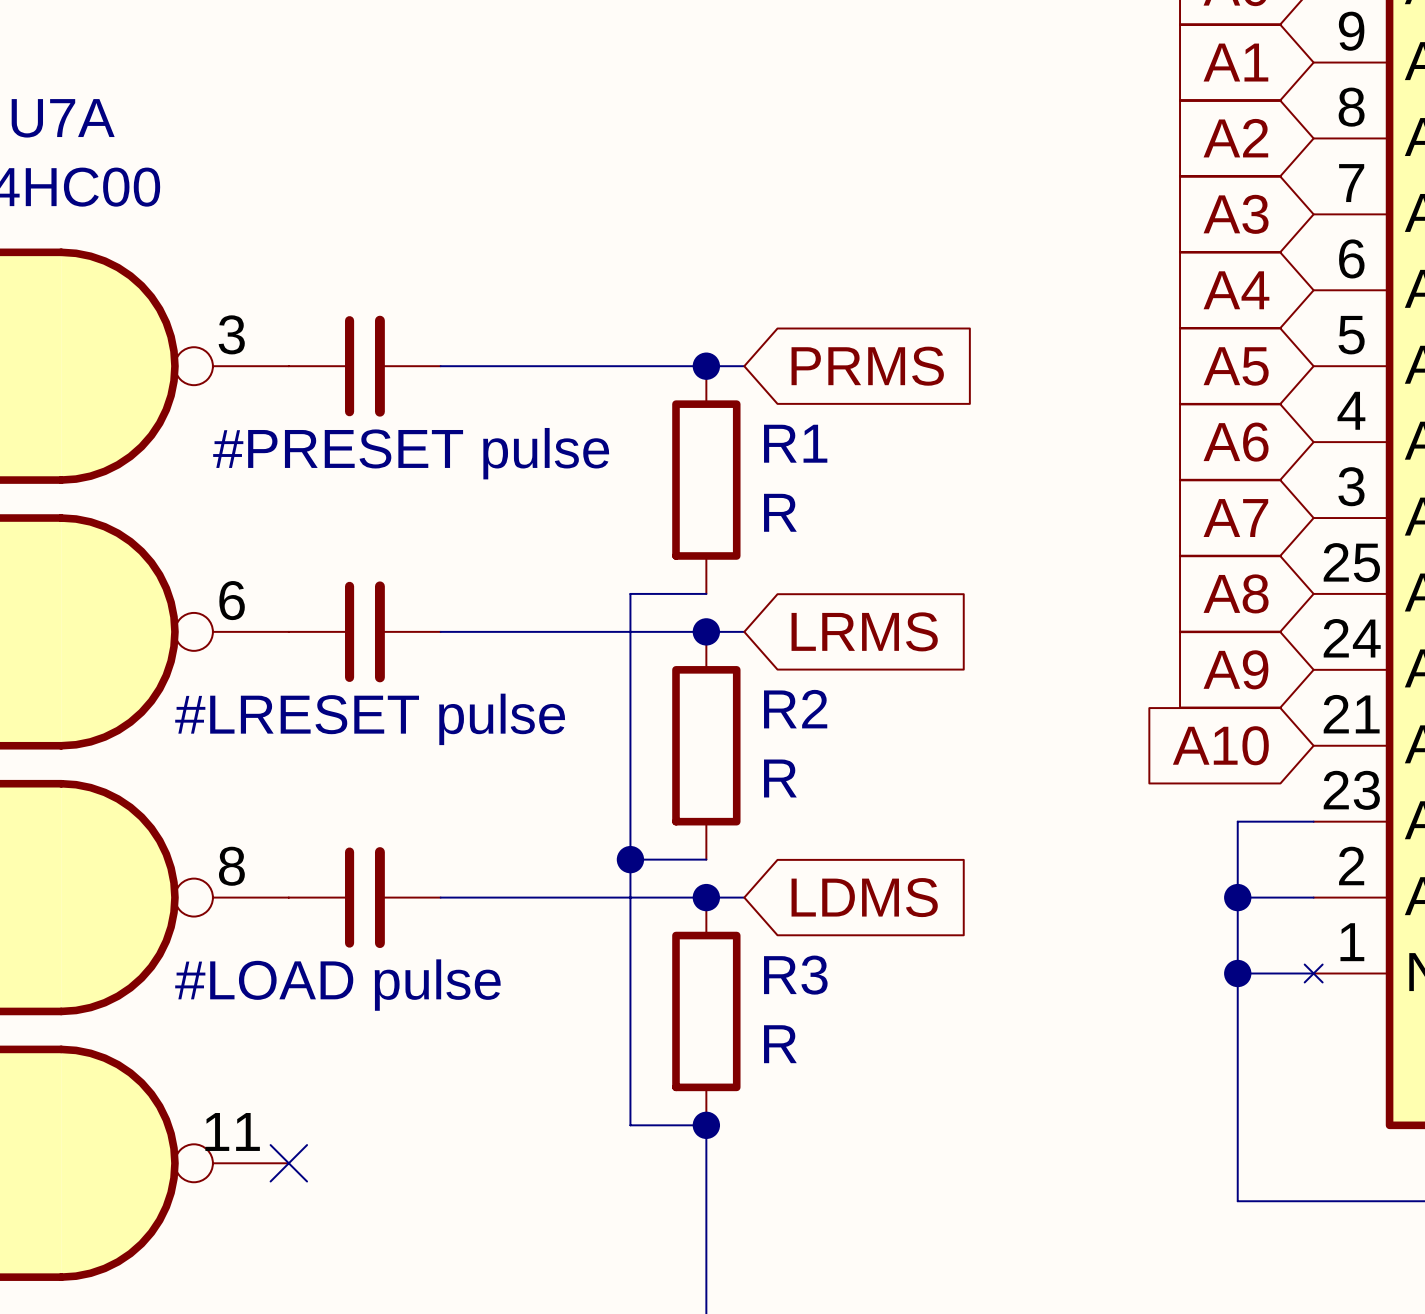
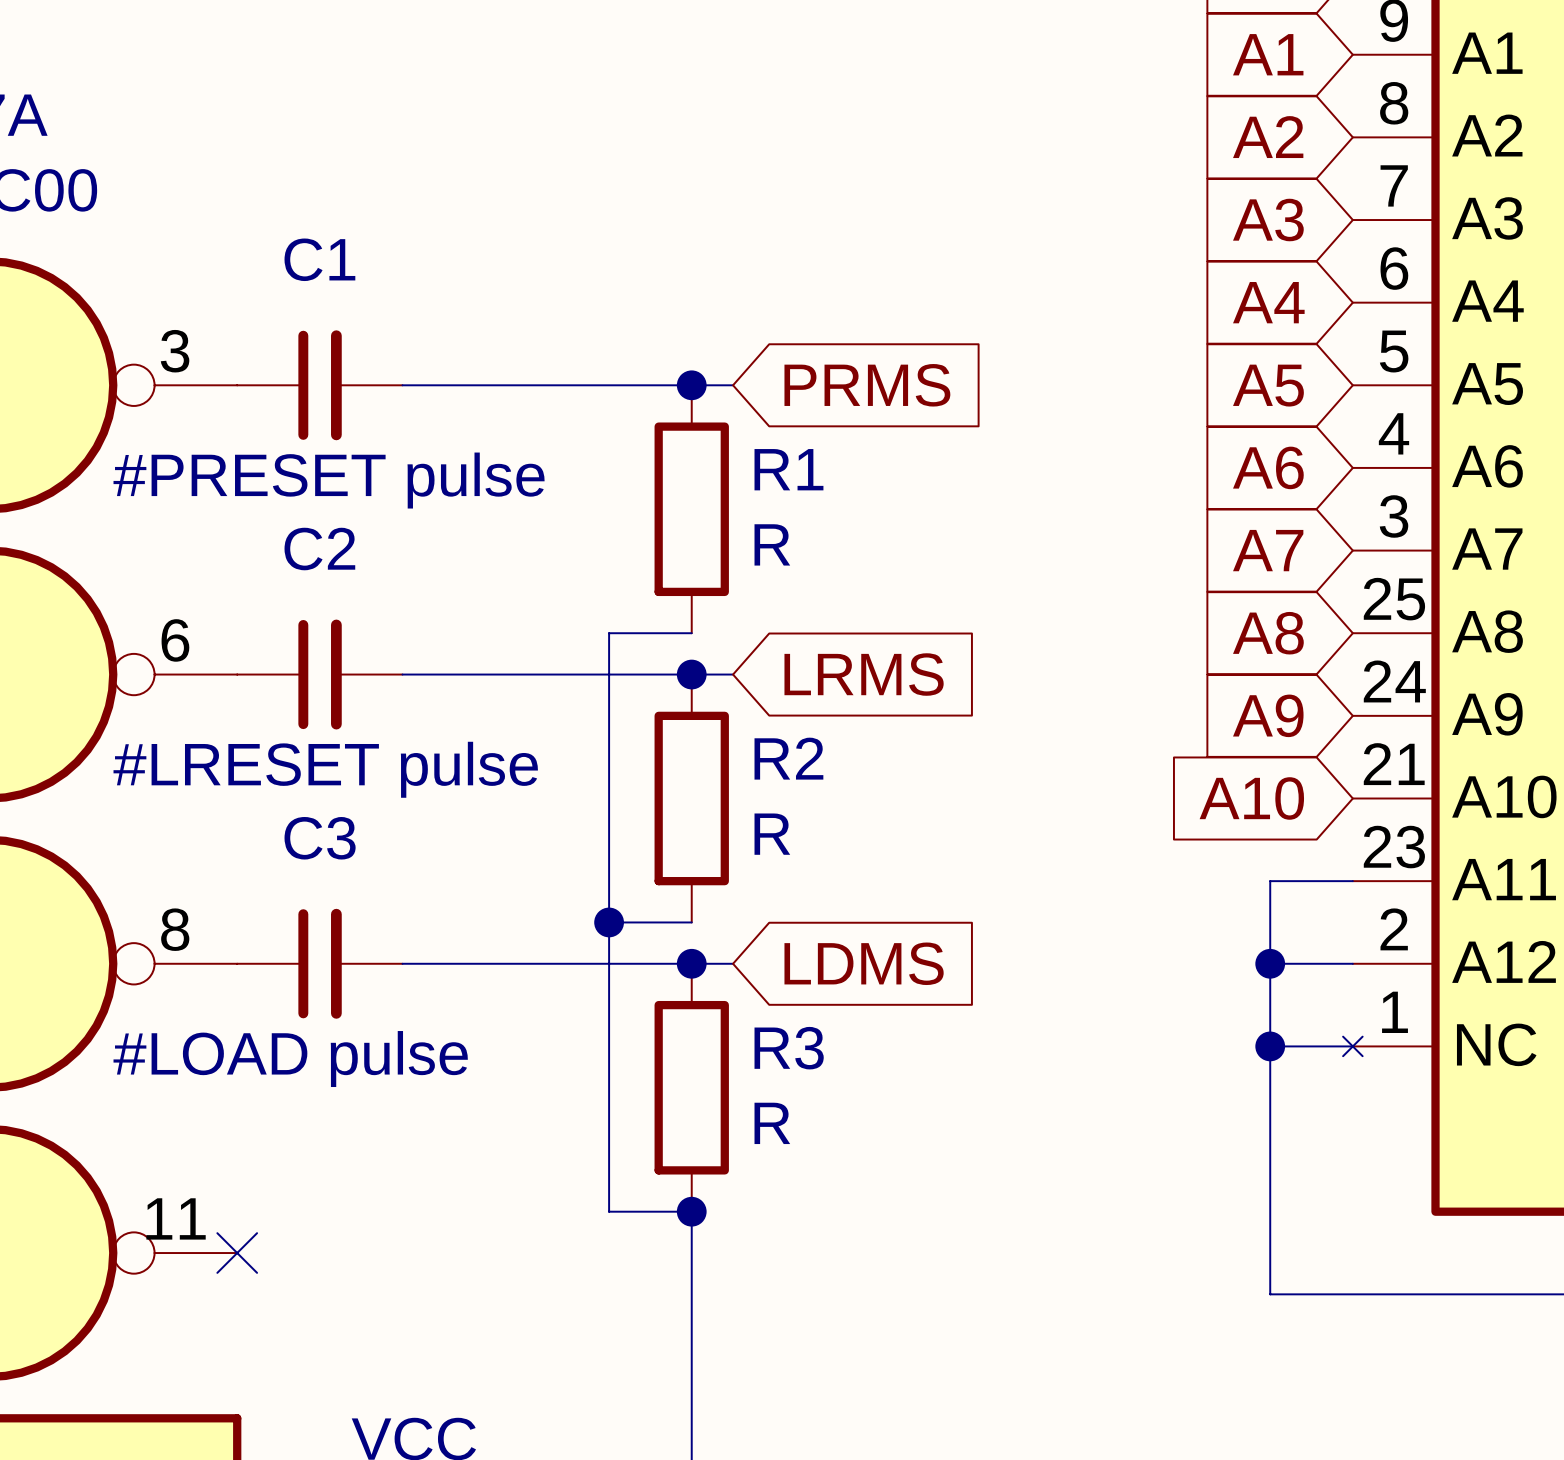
C1 name: none -> C1 (319, 259)
text position: #PRESET pulse (411, 453) -> #PRESET pulse (329, 480)
C2 name: none -> C2 (319, 549)
C3 name: none -> C3 (320, 838)

